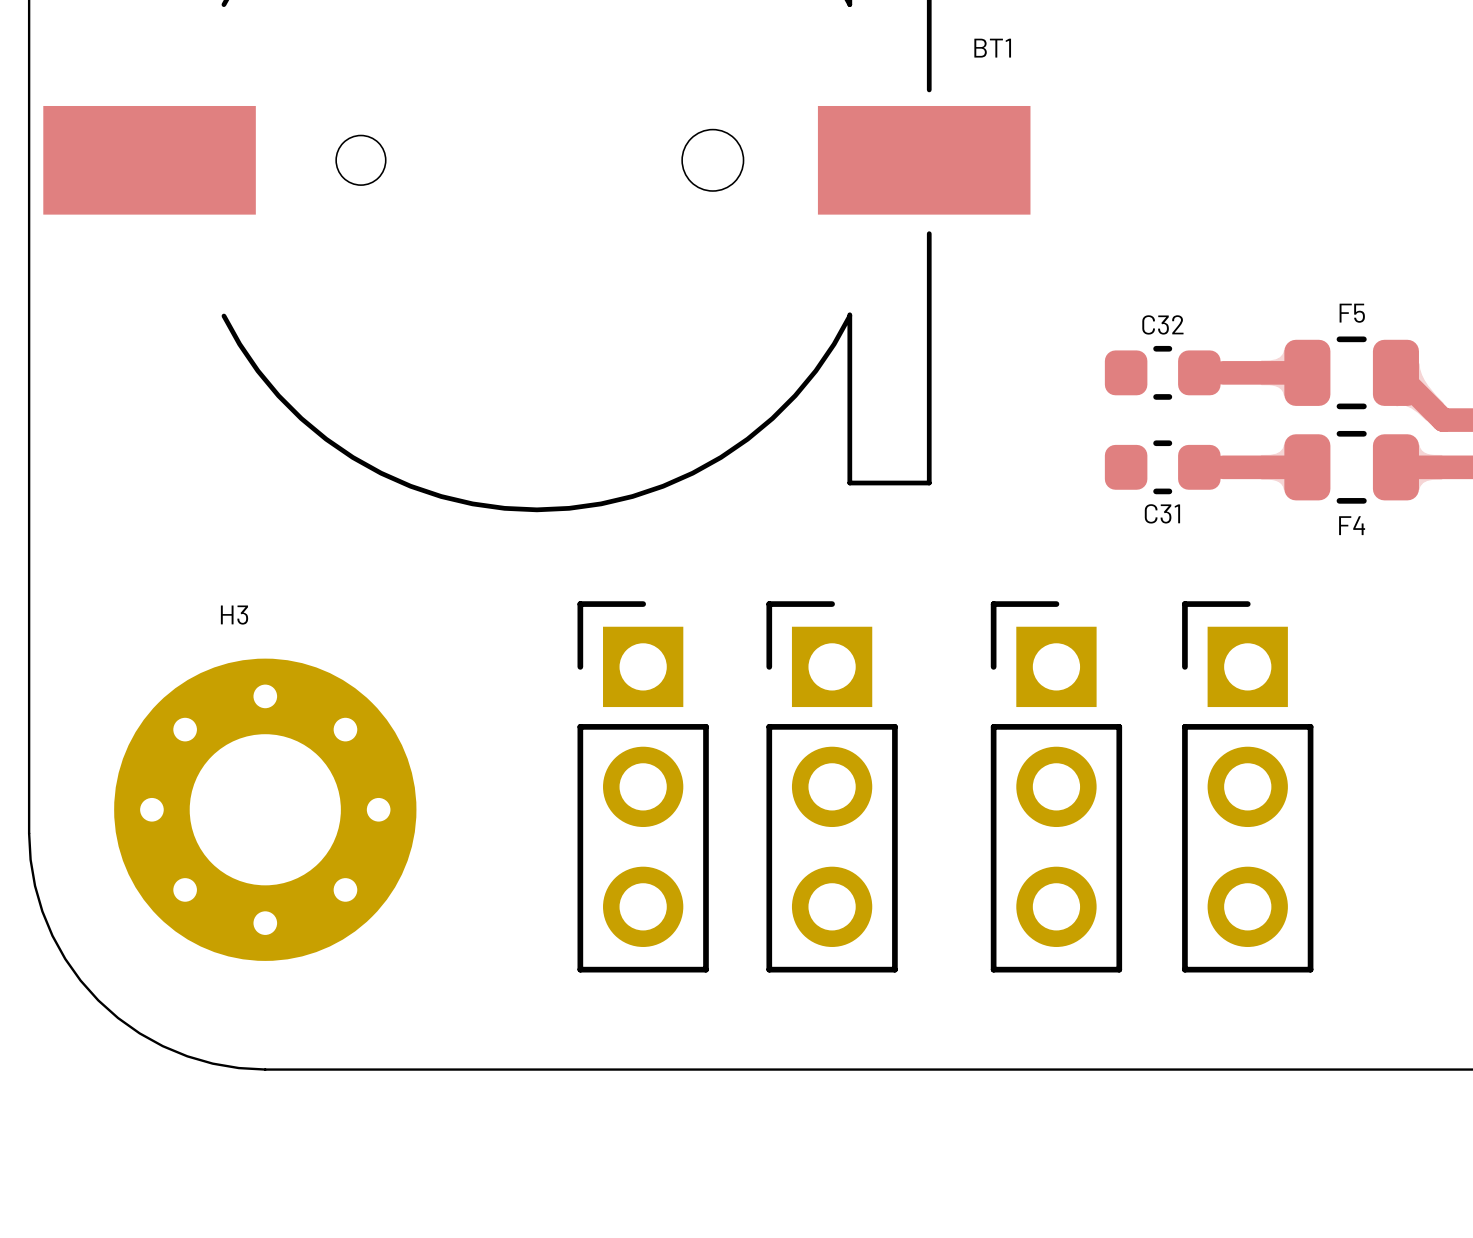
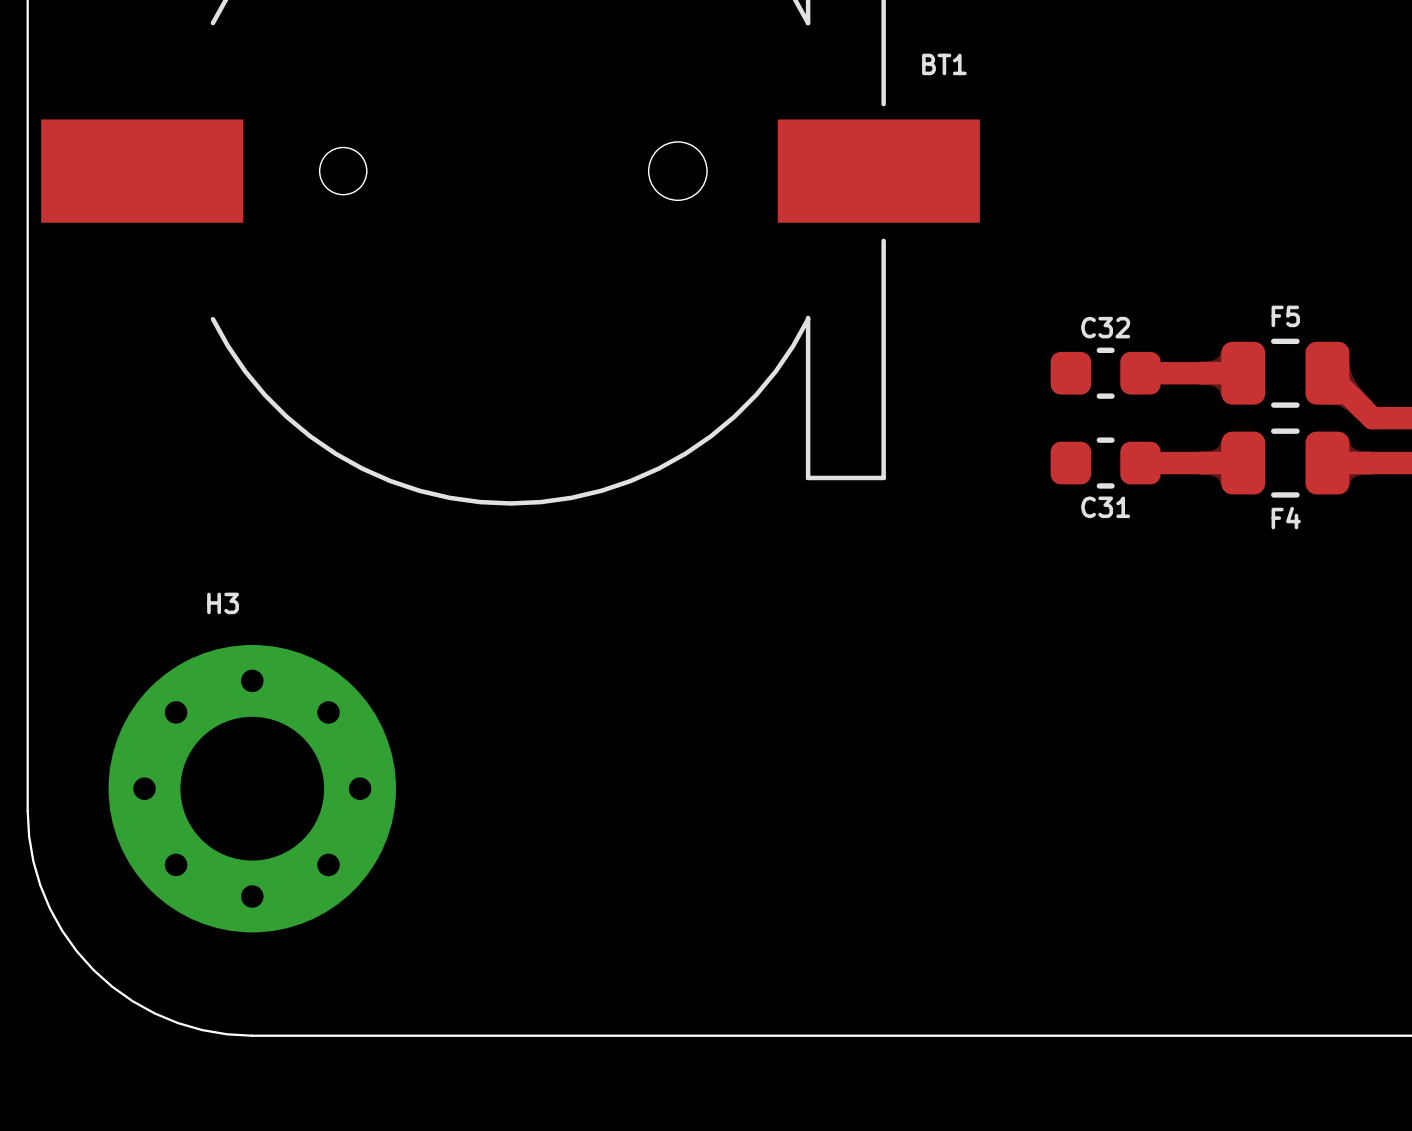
part: (643, 786) -> none
part: (832, 786) -> none
part: (1056, 786) -> none
part: (1247, 786) -> none

